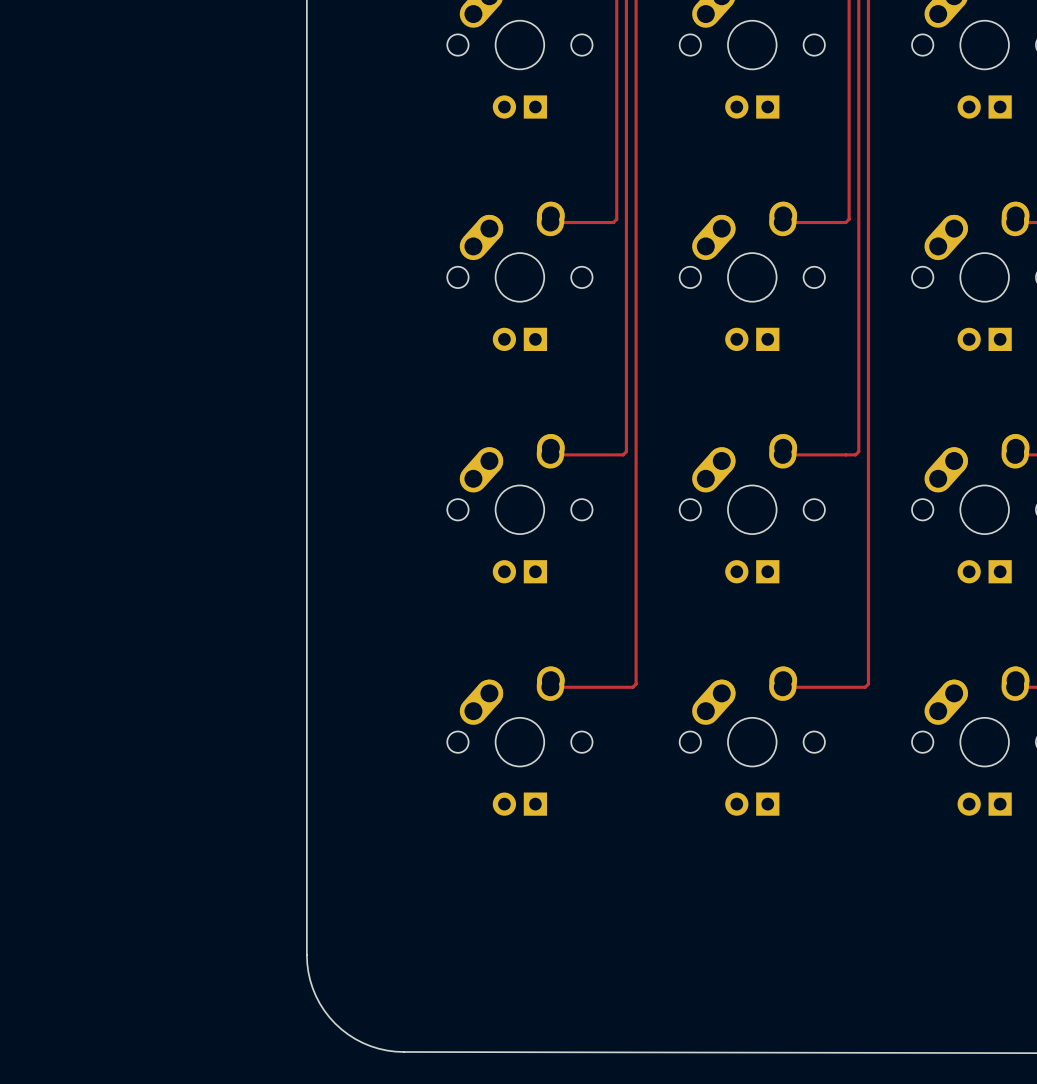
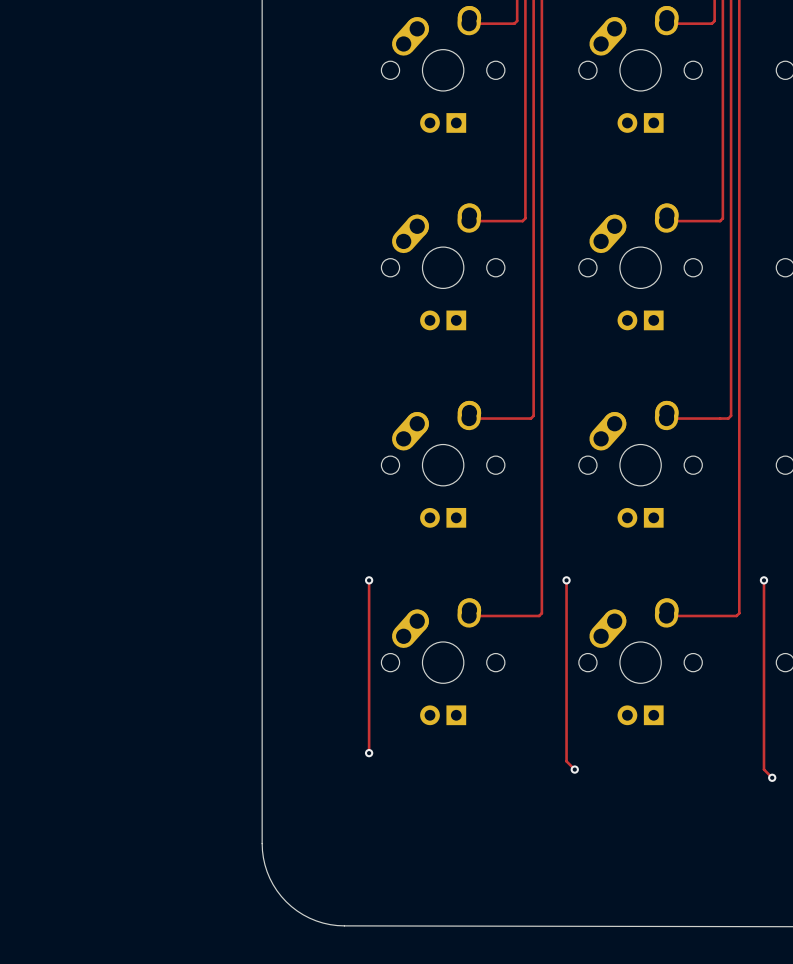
track: none -> (369, 580) (369, 753)
via: none -> (369, 580)
track: none -> (566, 580) (566, 761) (574, 769)
via: none -> (566, 580)
track: none -> (763, 580) (763, 769) (772, 777)
via: none -> (763, 580)
via: none -> (369, 753)
via: none -> (574, 769)
via: none -> (772, 777)

